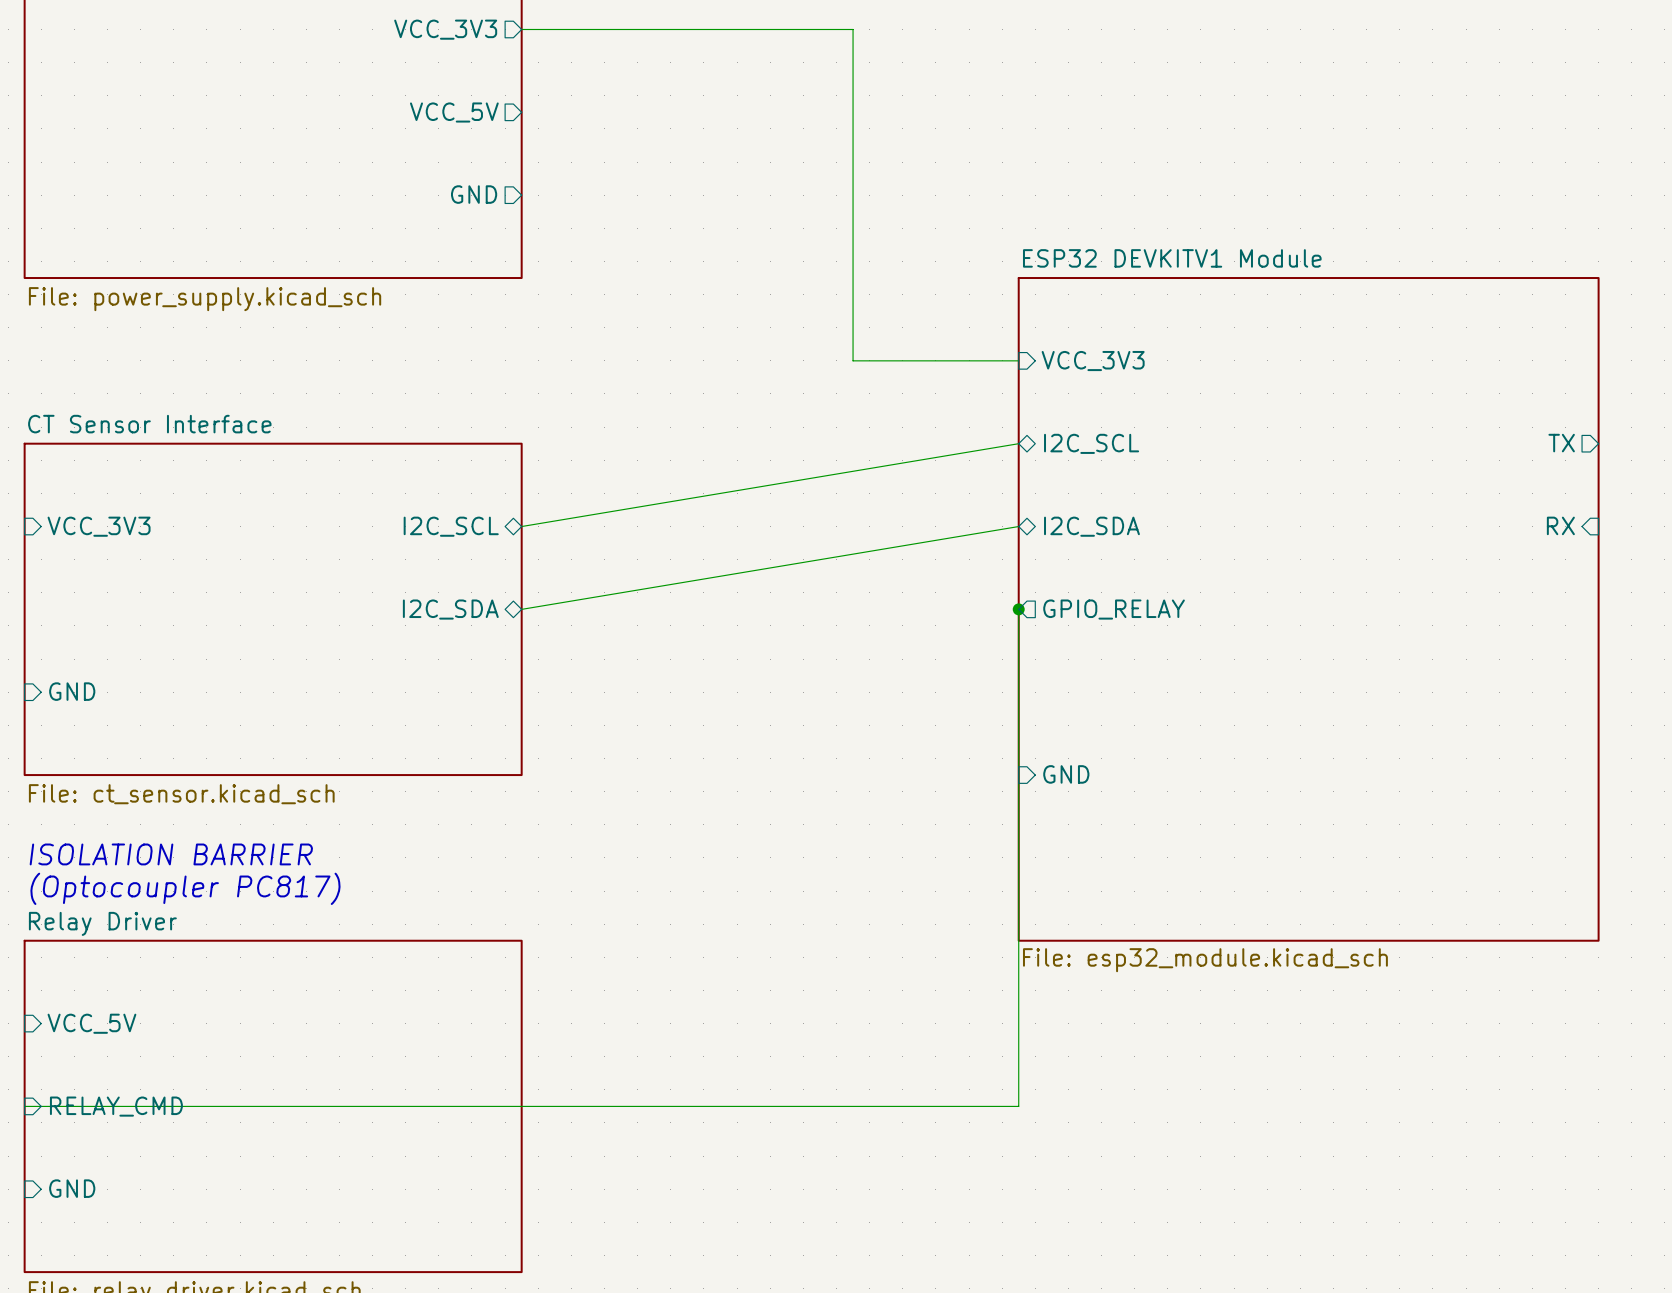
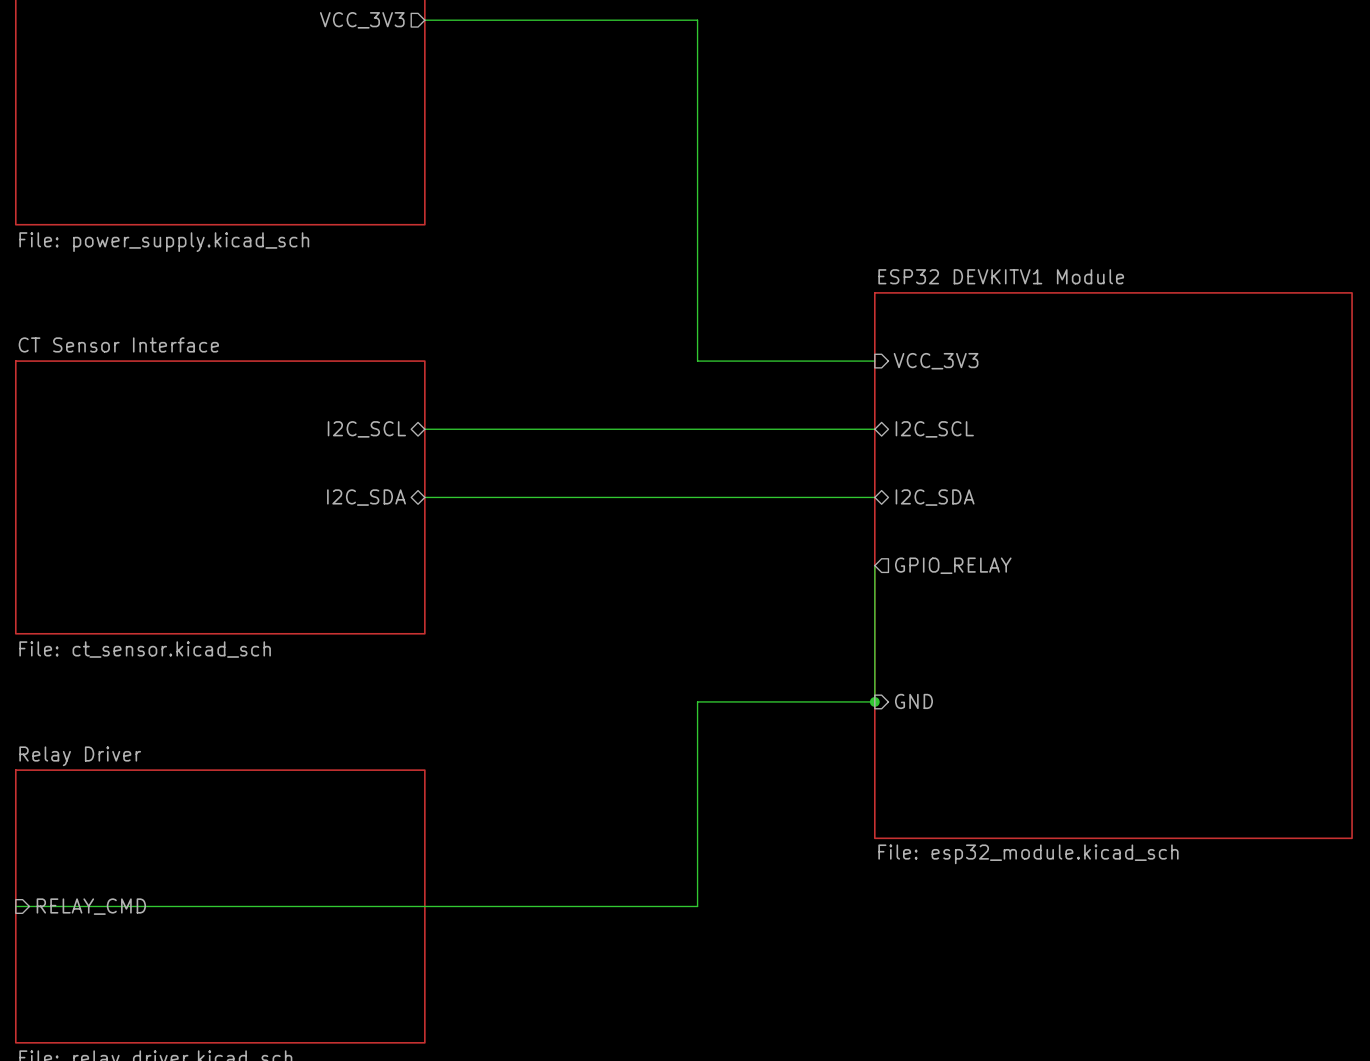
sheet pin: VCC_5V (454, 112) -> none
sheet pin: GND (474, 194) -> none
wire: (853, 360) (1018, 360) -> (697, 292) (697, 361) (874, 361)
sheet pin position: VCC_3V3 (1093, 361) -> VCC_3V3 (936, 361)
wire: (1018, 443) (521, 526) -> (874, 429) (424, 429)
sheet pin position: I2C_SCL (1091, 443) -> I2C_SCL (934, 429)
sheet pin: TX (1561, 443) -> none
sheet pin: RX (1560, 525) -> none
sheet pin: VCC_3V3 (99, 526) -> none
wire: (1018, 526) (521, 609) -> (874, 497) (424, 497)
sheet pin position: I2C_SDA (1091, 526) -> I2C_SDA (935, 497)
wire: (1018, 609) (1018, 1106) (853, 1106) -> (874, 565) (874, 701) (697, 701) (697, 906)
junction: (1018, 609) -> none
sheet pin position: GPIO_RELAY (1114, 609) -> GPIO_RELAY (953, 565)
sheet ESP32 DEVKITV1 Module position: (1308, 609) -> (1113, 565)
sheet pin: GND (72, 691) -> none
sheet pin position: GND (1066, 774) -> GND (913, 701)
text: ISOLATION BARRIER (171, 854) -> none
junction: none -> (874, 701)
text: (Optocoupler PC817) (185, 888) -> none
sheet pin: VCC_5V (91, 1023) -> none
sheet pin: GND (72, 1188) -> none

